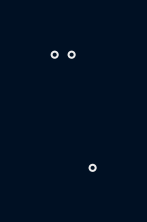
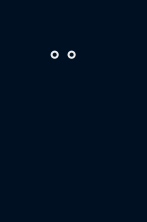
via: (92, 167) -> none

